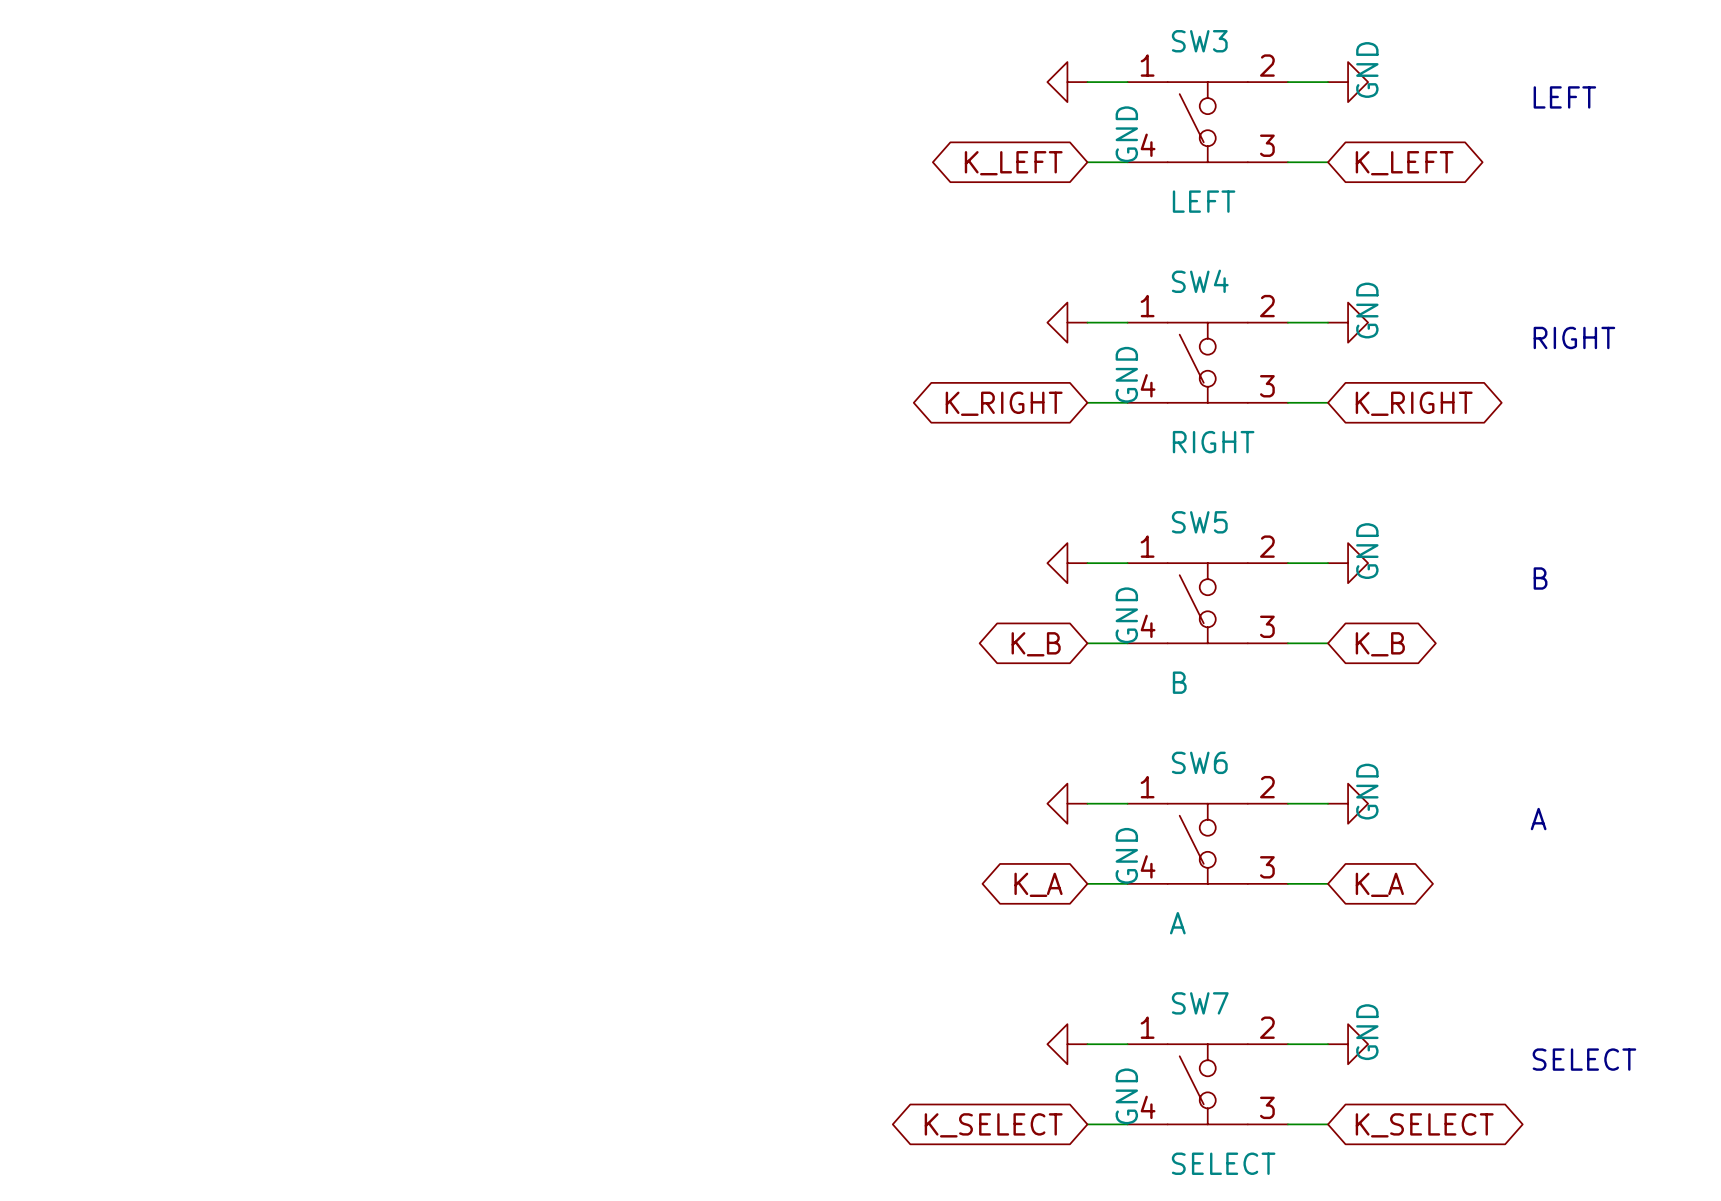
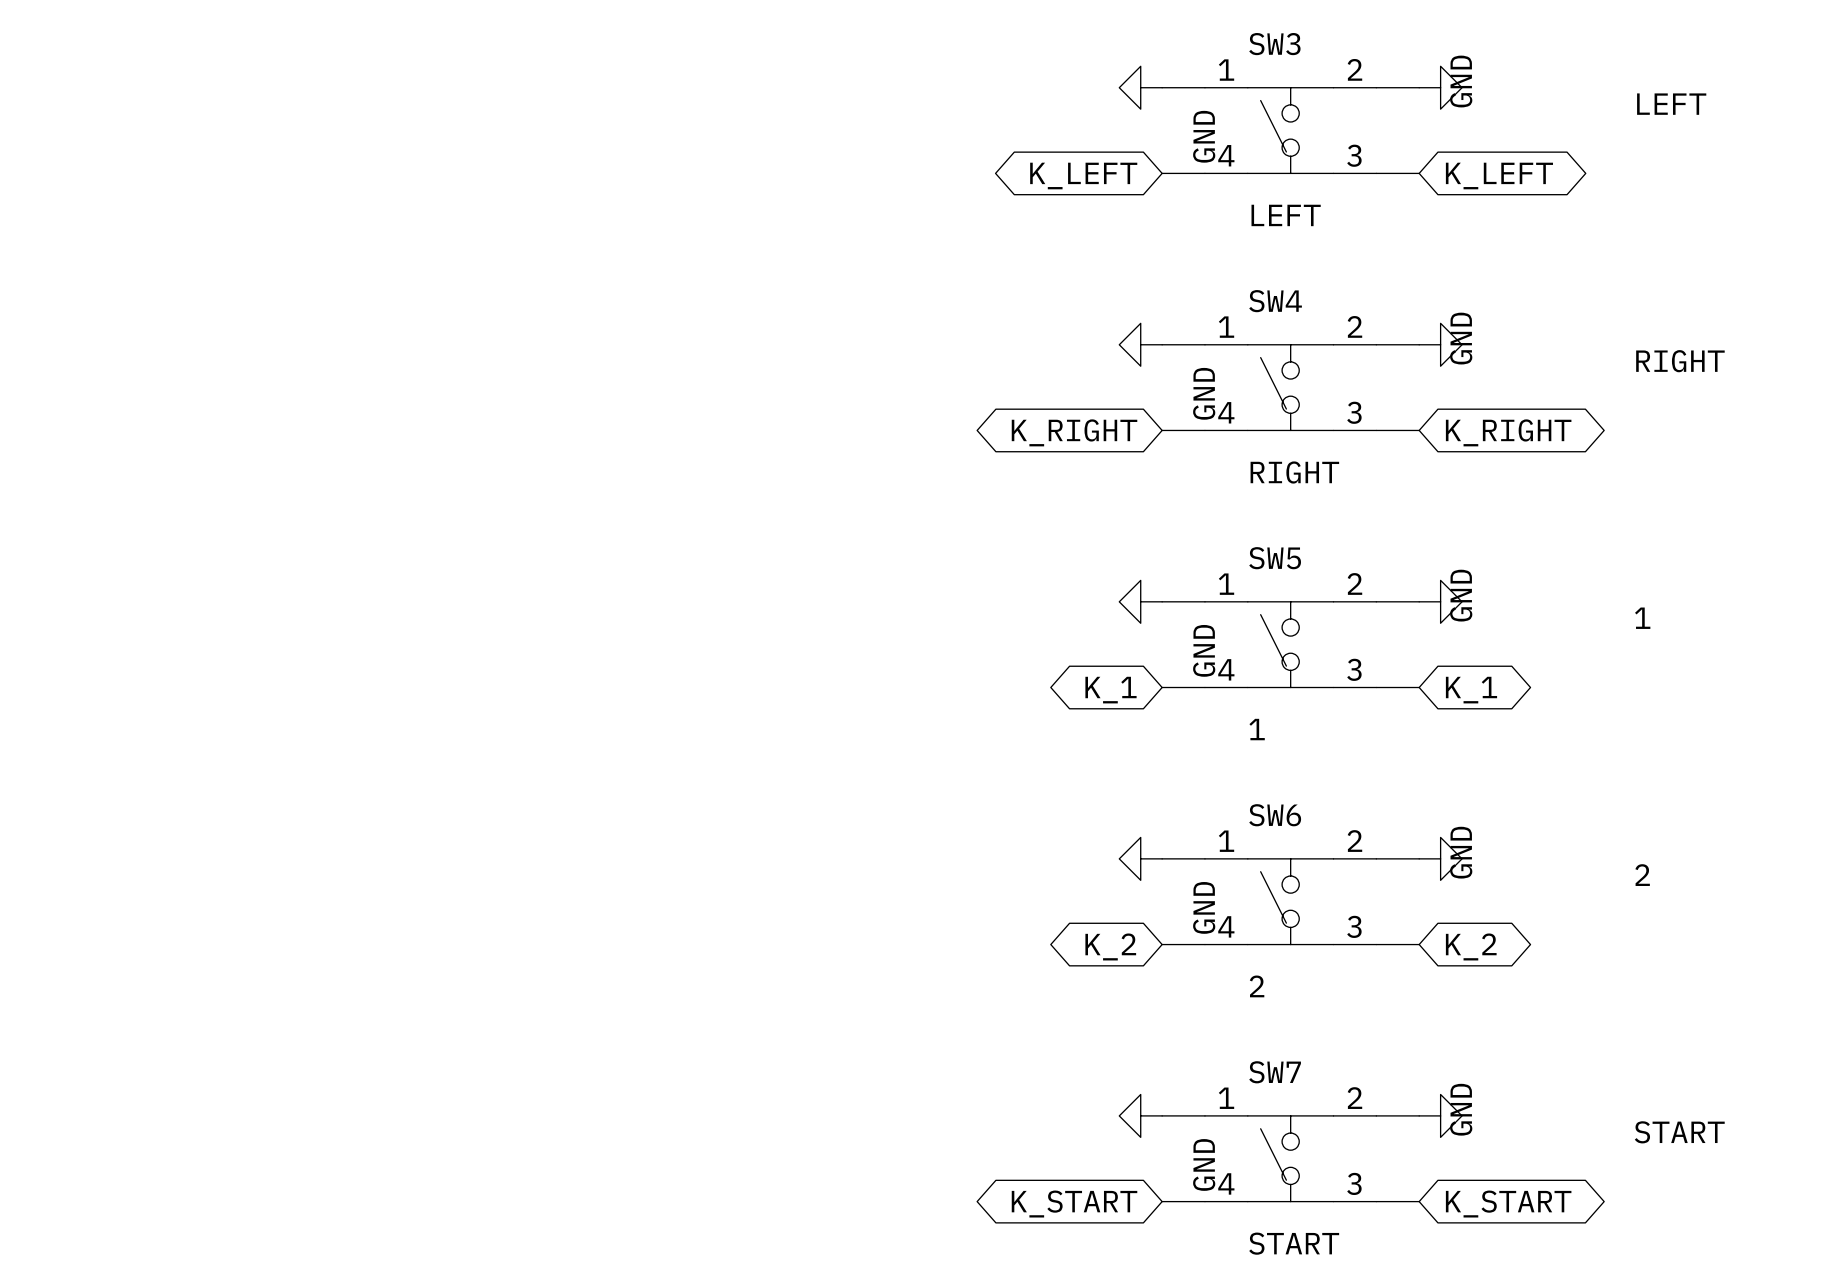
text: B (1540, 578) -> 1 (1642, 618)
global label: K_B (1036, 644) -> K_1 (1111, 690)
global label: K_B (1380, 644) -> K_1 (1471, 690)
SW5 value: B (1179, 682) -> 1 (1257, 729)
text: A (1538, 819) -> 2 (1642, 875)
global label: K_A (1038, 884) -> K_2 (1110, 946)
global label: K_A (1379, 884) -> K_2 (1471, 946)
SW6 value: A (1177, 923) -> 2 (1257, 986)
text: SELECT (1584, 1059) -> START (1679, 1132)
global label: K_SELECT (993, 1125) -> K_START (1074, 1204)
global label: K_SELECT (1424, 1125) -> K_START (1508, 1204)
SW7 value: SELECT (1223, 1163) -> START (1294, 1243)

